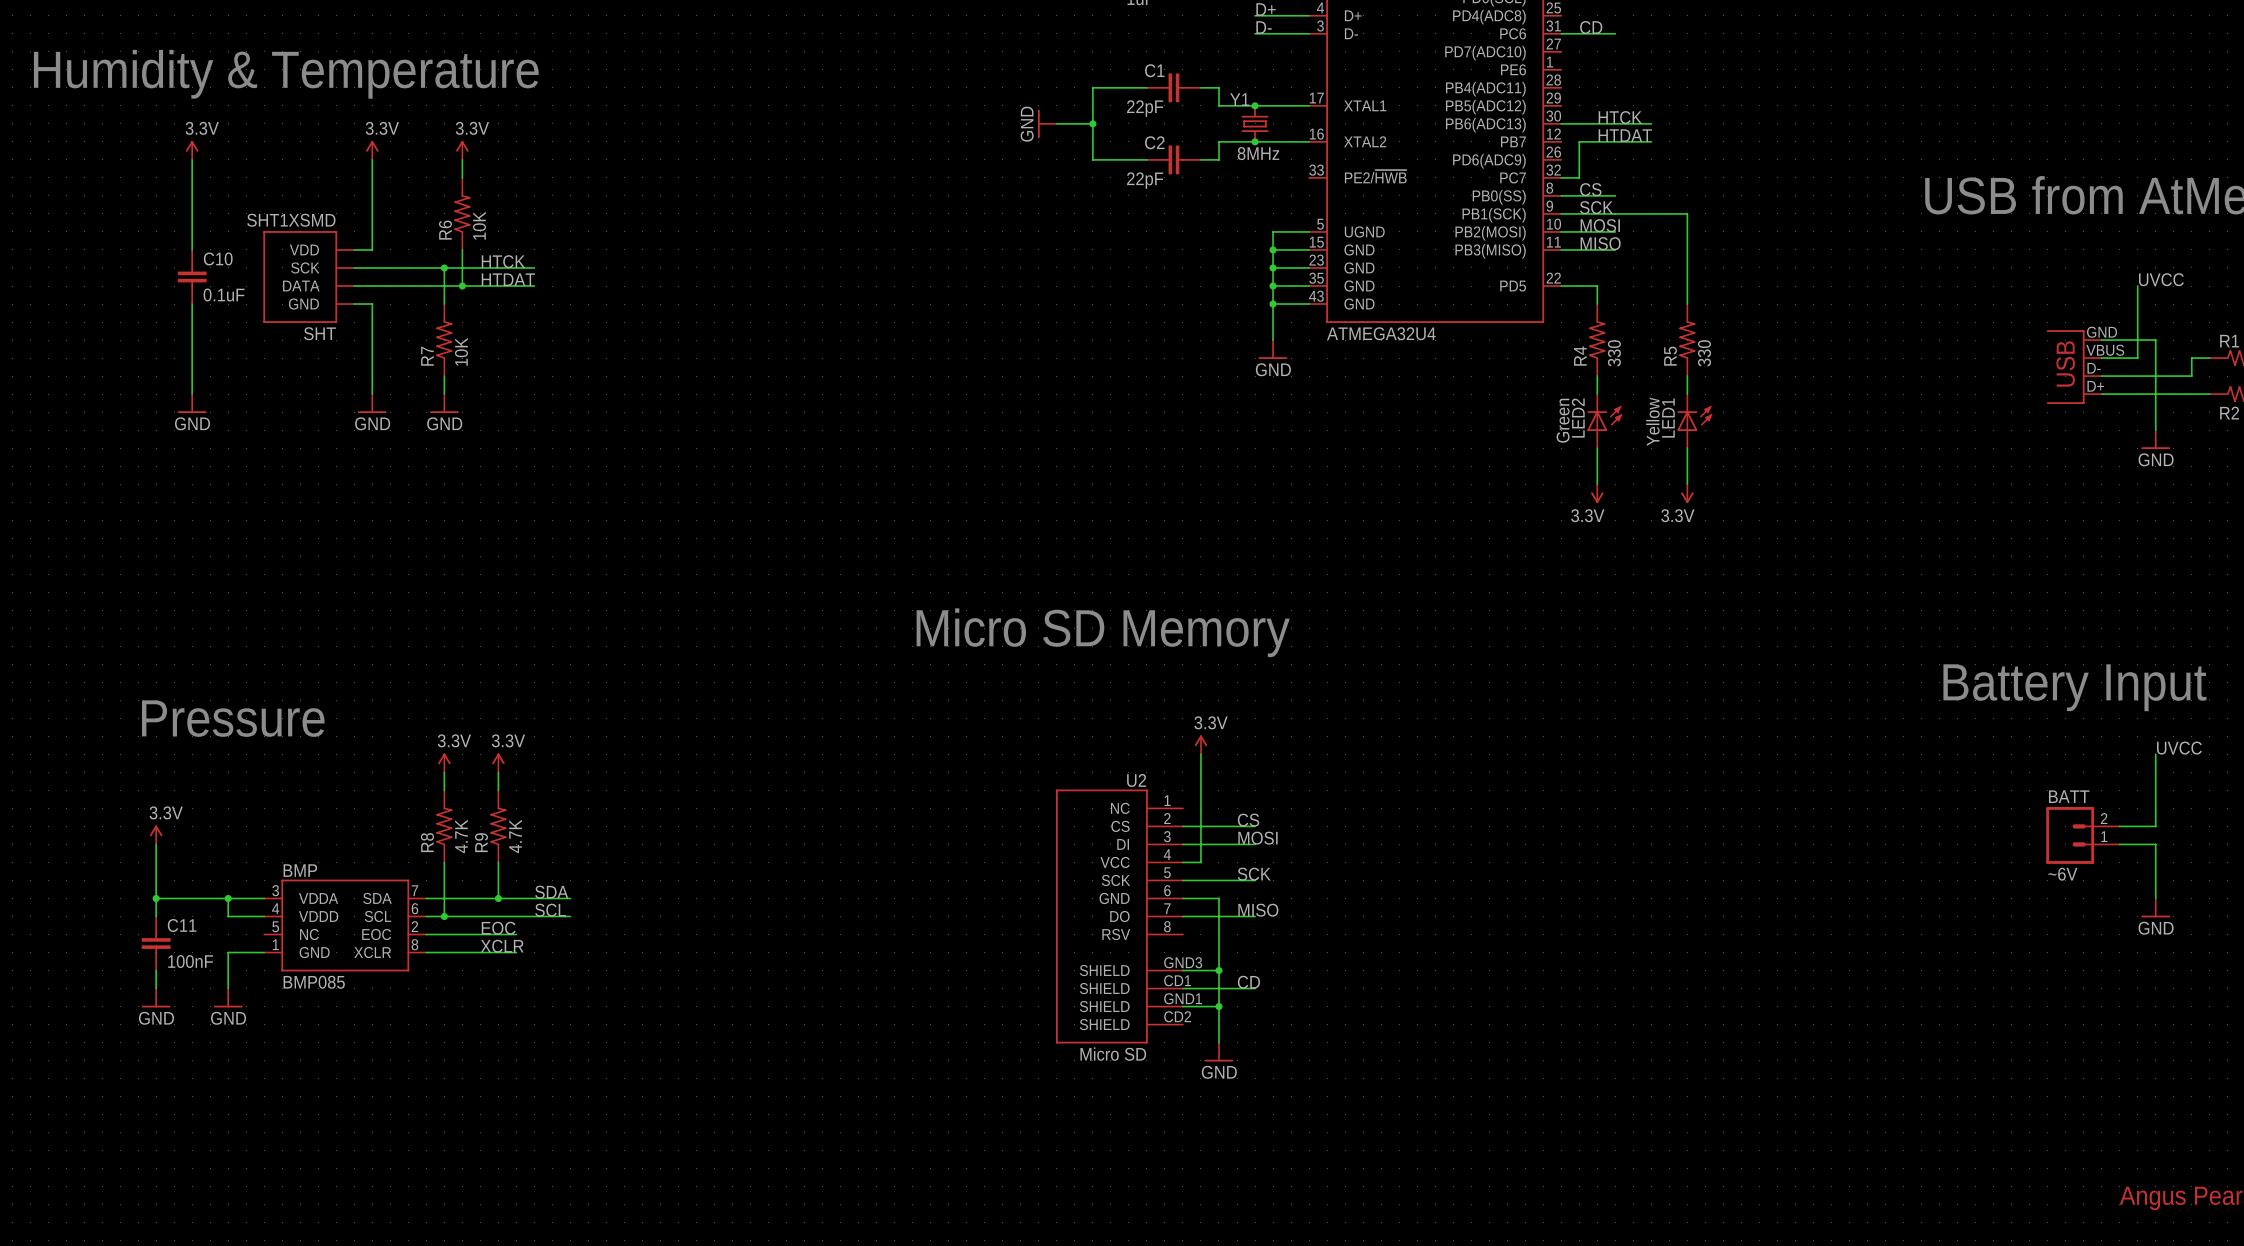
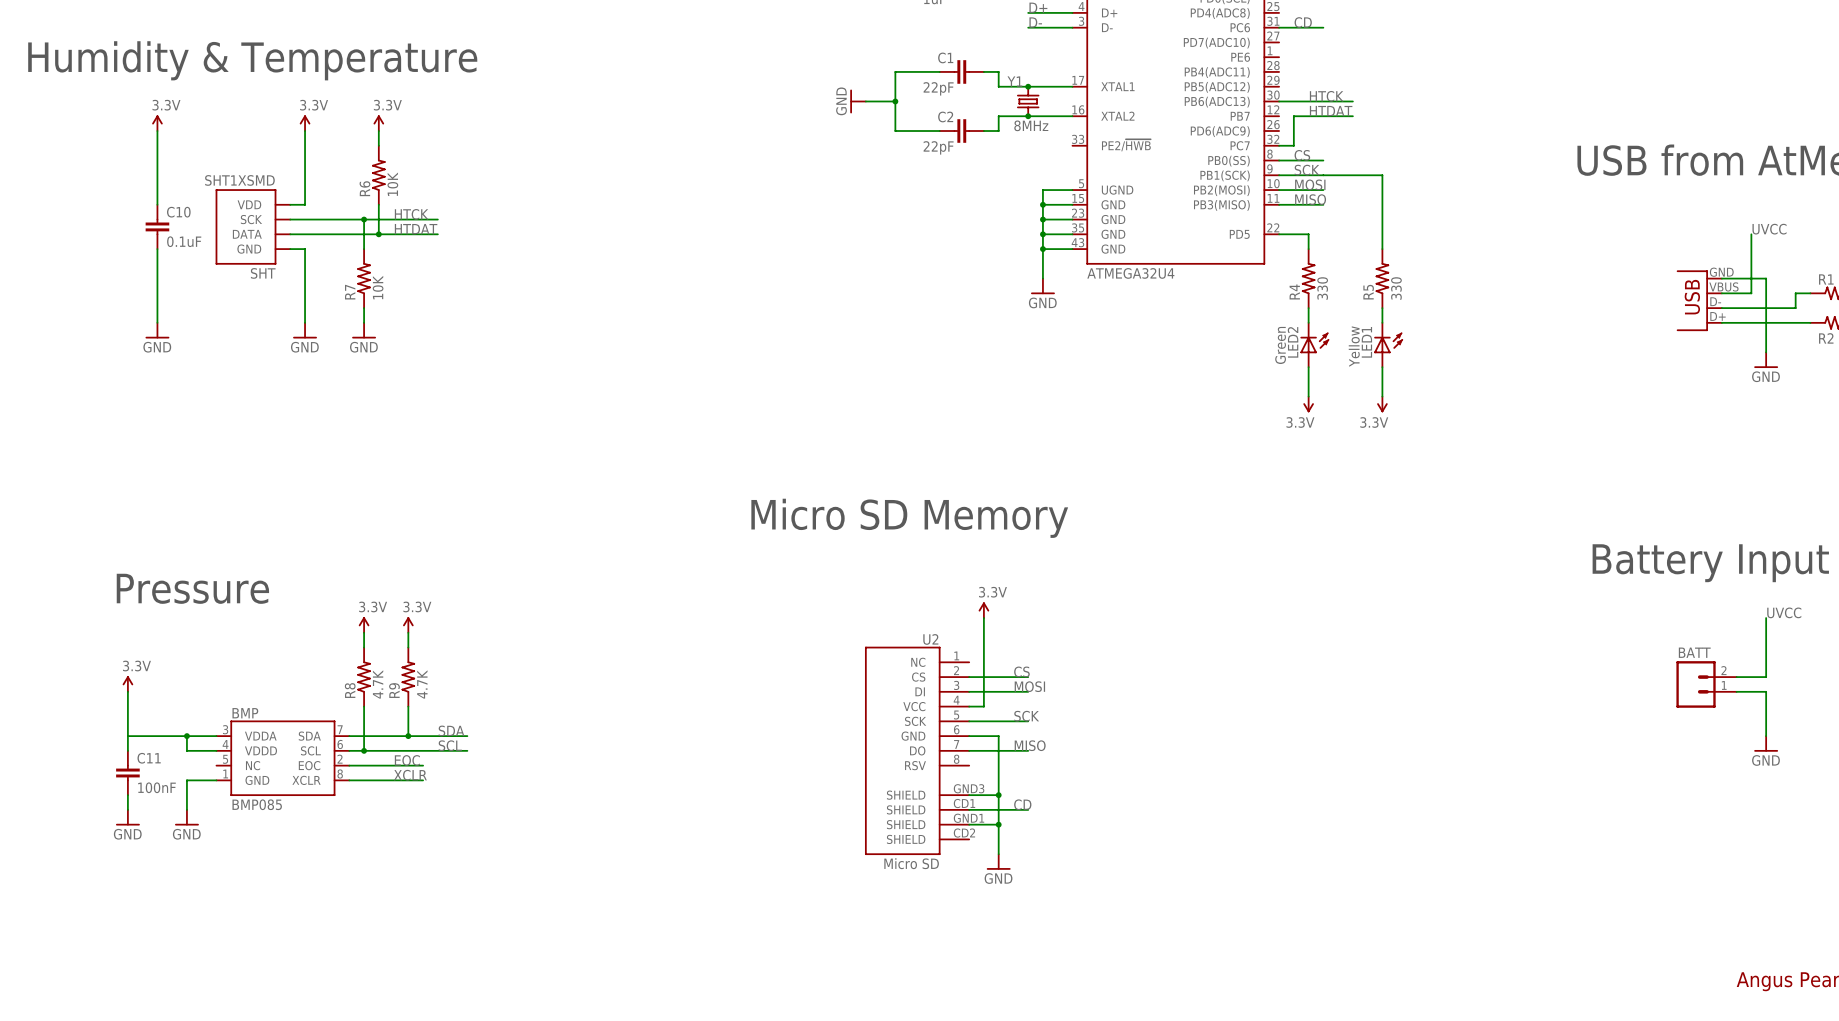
BATT value: ~6V (2062, 874) -> none
junction: (156, 898) -> none

